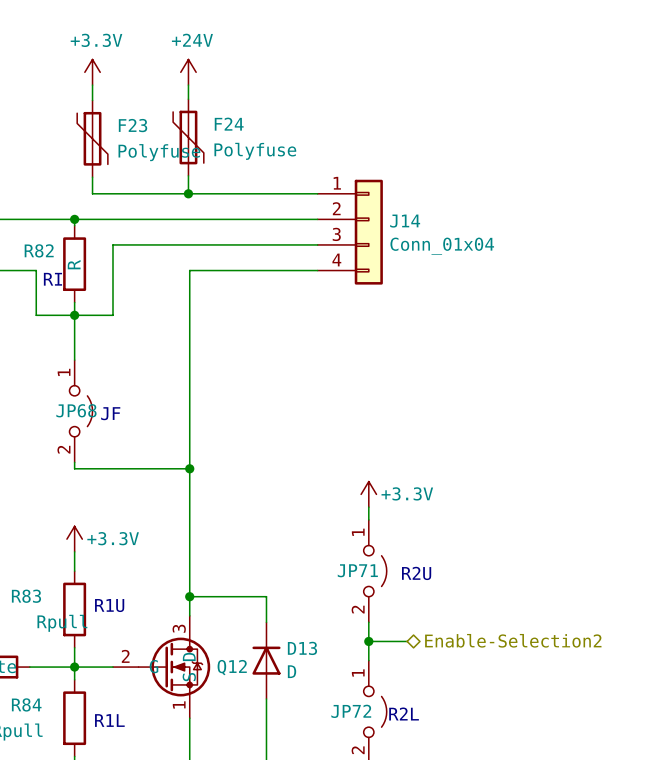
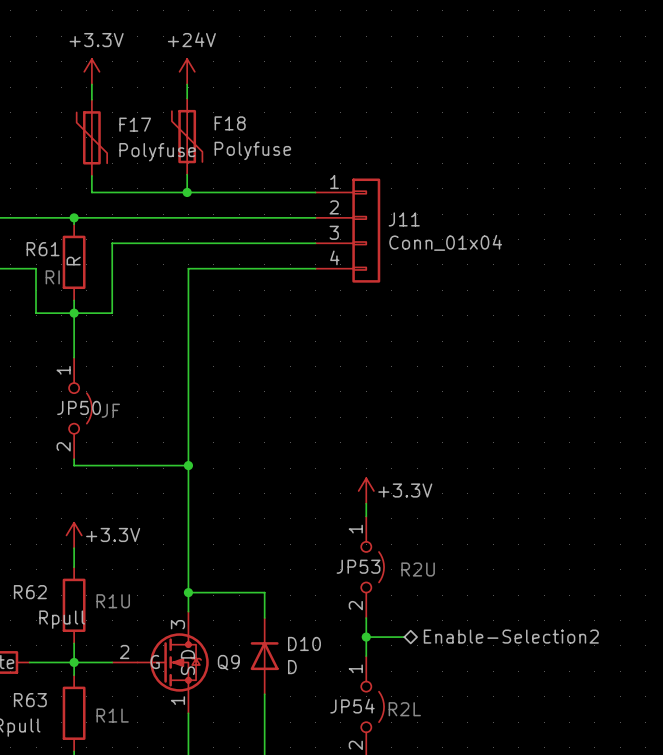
F24 name: F24 (229, 124) -> F18 (230, 123)
F23 name: F23 (133, 125) -> F17 (135, 124)
J14 name: J14 (405, 221) -> J11 (404, 219)
R82 name: R82 (39, 250) -> R61 (43, 249)
JP68 name: JP68 (76, 410) -> JP50 (79, 407)
JP71 name: JP71 (357, 570) -> JP53 (358, 566)
R83 name: R83 (26, 596) -> R62 (30, 592)
D13 name: D13 (302, 648) -> D10 (304, 643)
Q12 name: Q12 (232, 667) -> Q9 (228, 662)
R84 name: R84 (26, 704) -> R63 (30, 700)
JP72 name: JP72 (351, 711) -> JP54 (352, 706)

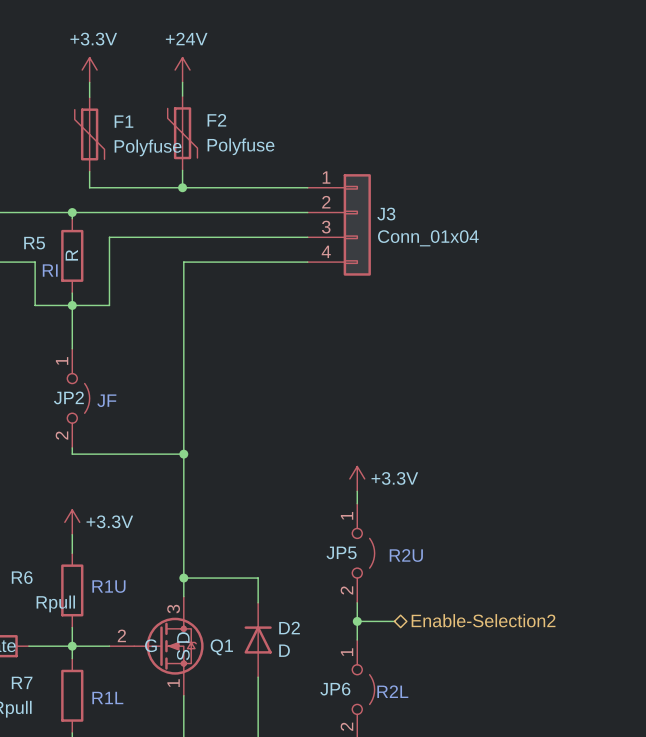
F18 name: F18 (230, 123) -> F2 (216, 120)
F17 name: F17 (135, 124) -> F1 (123, 121)
J11 name: J11 (404, 219) -> J3 (386, 214)
R61 name: R61 (43, 249) -> R5 (34, 243)
JP50 name: JP50 (79, 407) -> JP2 (68, 397)
JP53 name: JP53 (358, 566) -> JP5 (341, 552)
R62 name: R62 (30, 592) -> R6 (22, 577)
D10 name: D10 (304, 643) -> D2 (289, 628)
Q9 name: Q9 (228, 662) -> Q1 (221, 647)
R63 name: R63 (30, 700) -> R7 (22, 682)
JP54 name: JP54 (352, 706) -> JP6 (335, 689)

